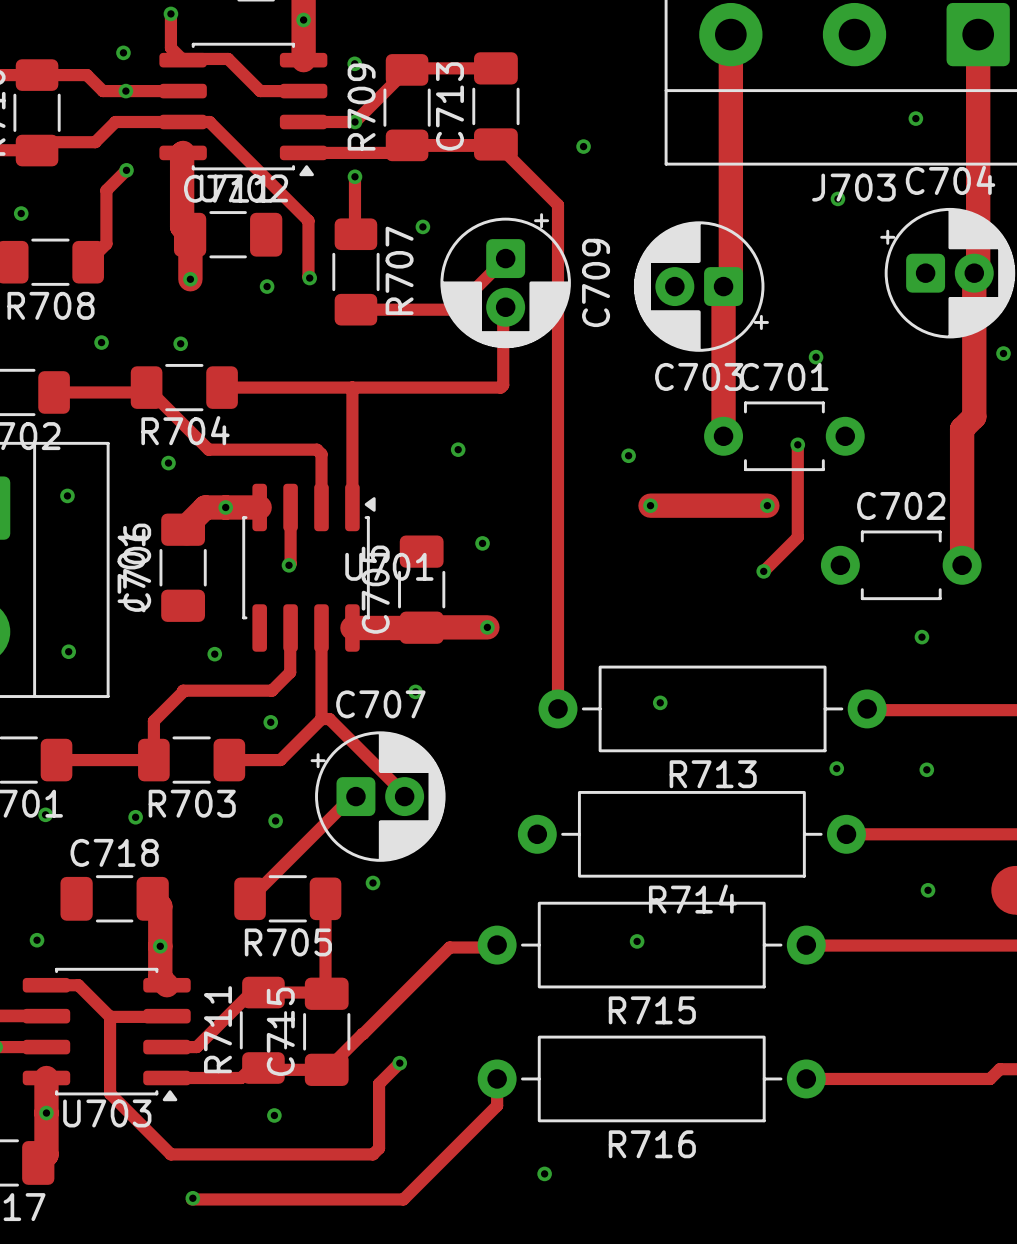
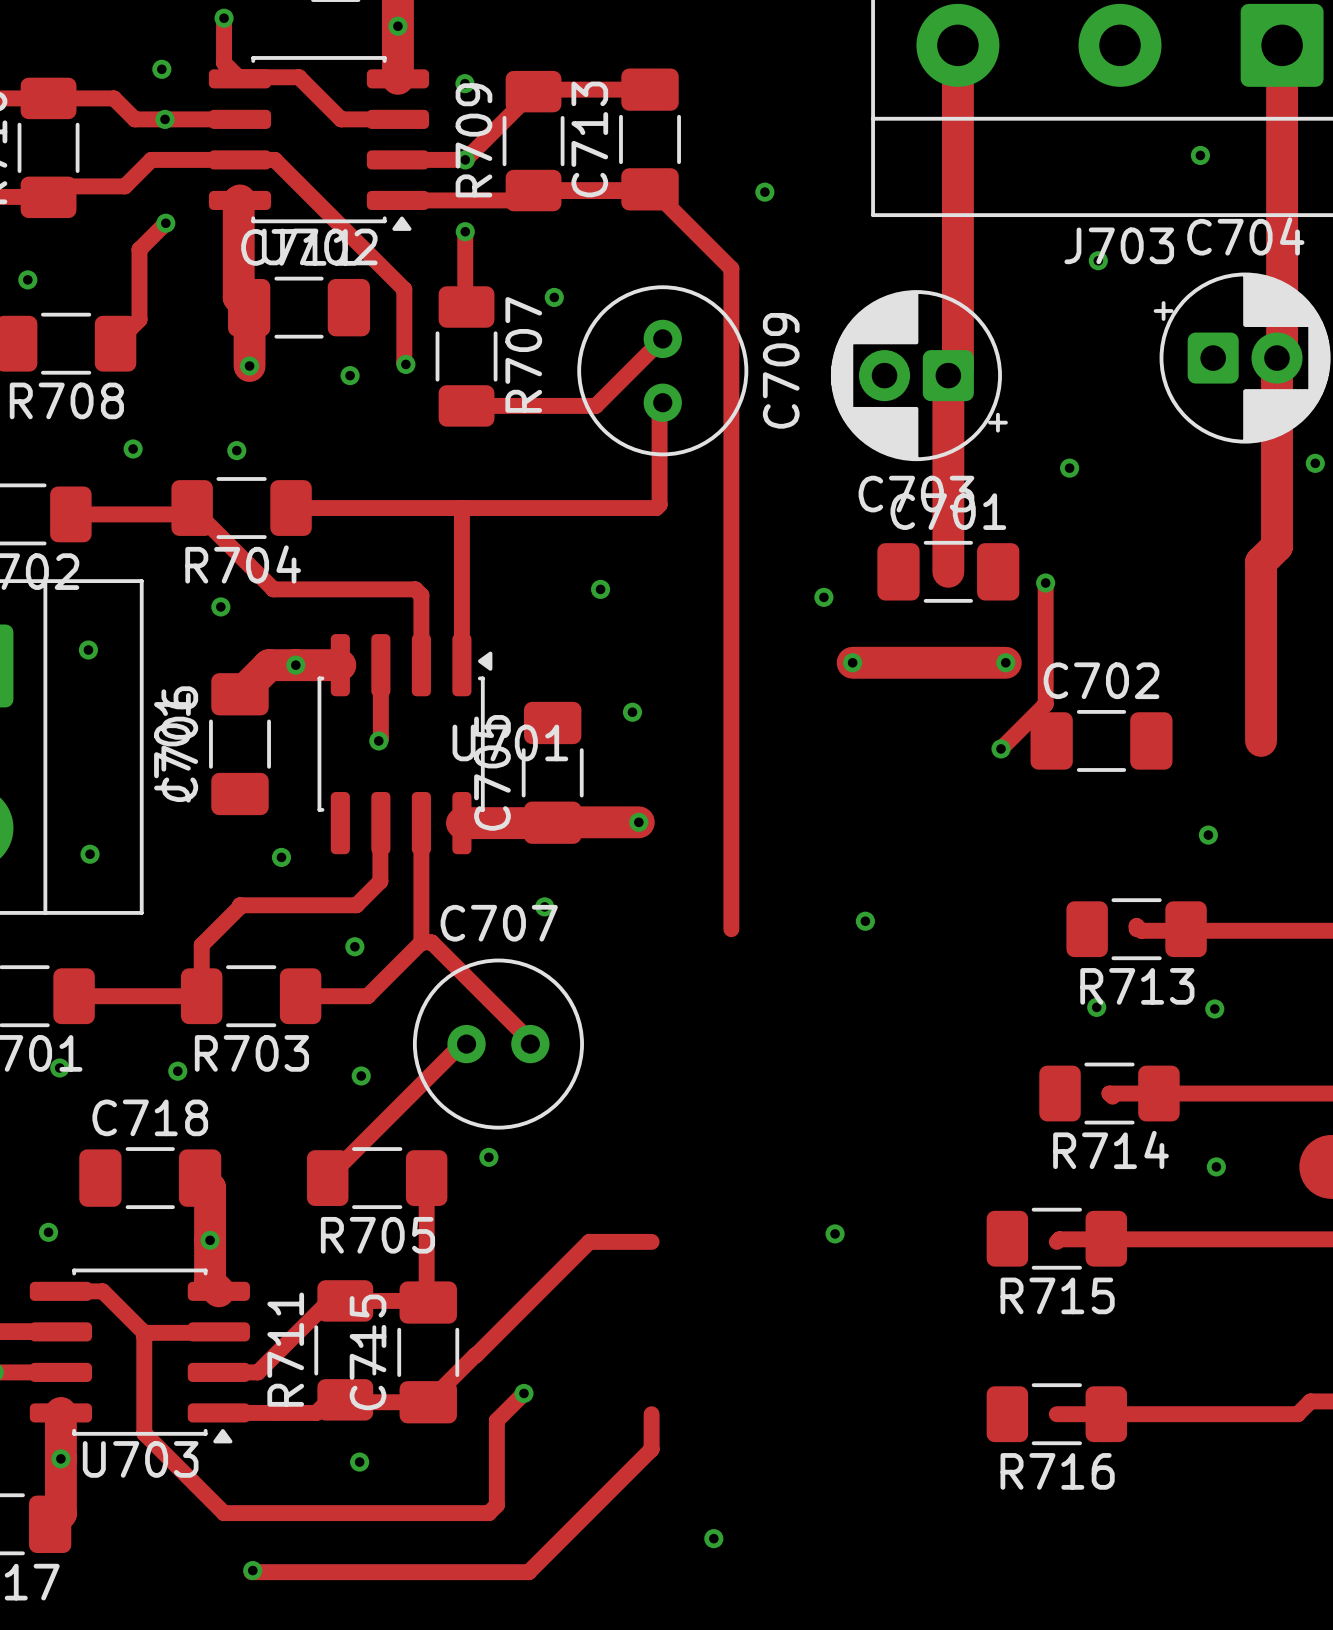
C709 footprint: [440, 213, 571, 349] -> [577, 285, 749, 457]
C701 footprint: [704, 401, 865, 472] -> [877, 540, 1020, 603]
C702 footprint: [820, 530, 982, 601] -> [1030, 710, 1173, 772]
R713 footprint: [538, 665, 887, 753] -> [1066, 898, 1207, 961]
C707 footprint: [310, 731, 446, 862] -> [412, 958, 584, 1130]
R714 footprint: [517, 790, 866, 878] -> [1039, 1062, 1180, 1125]
R715 footprint: [477, 901, 826, 989] -> [986, 1207, 1128, 1270]
R716 footprint: [477, 1035, 826, 1123] -> [986, 1383, 1128, 1446]

